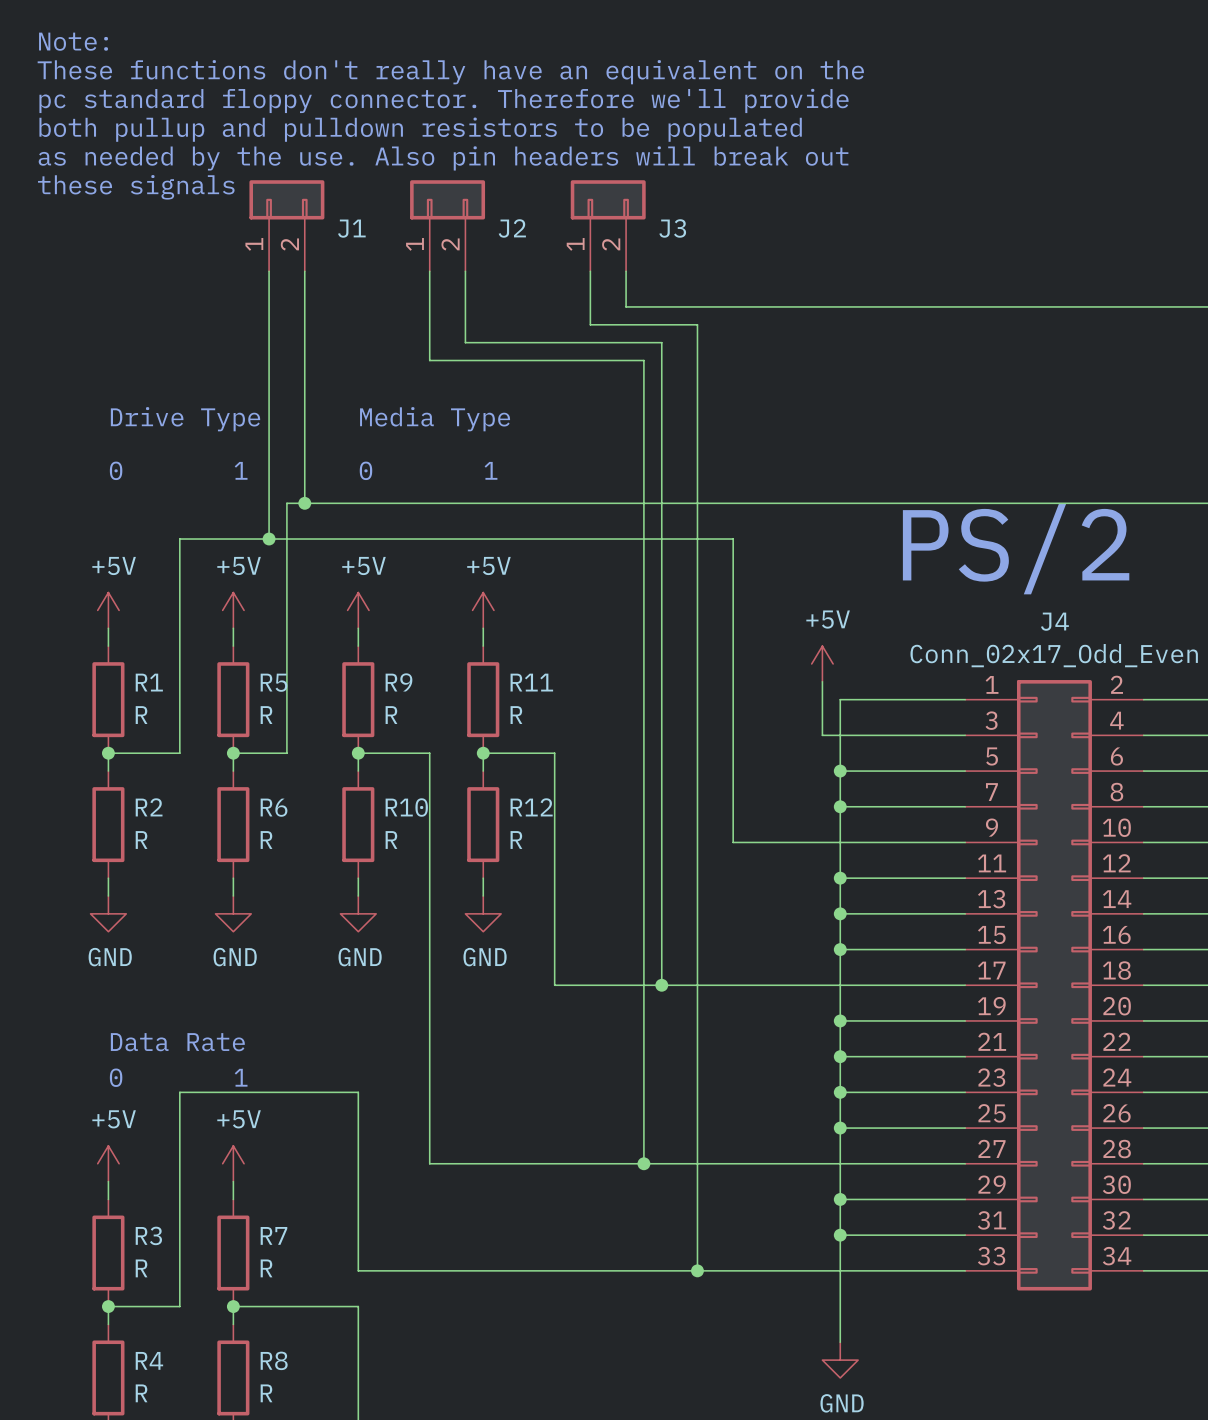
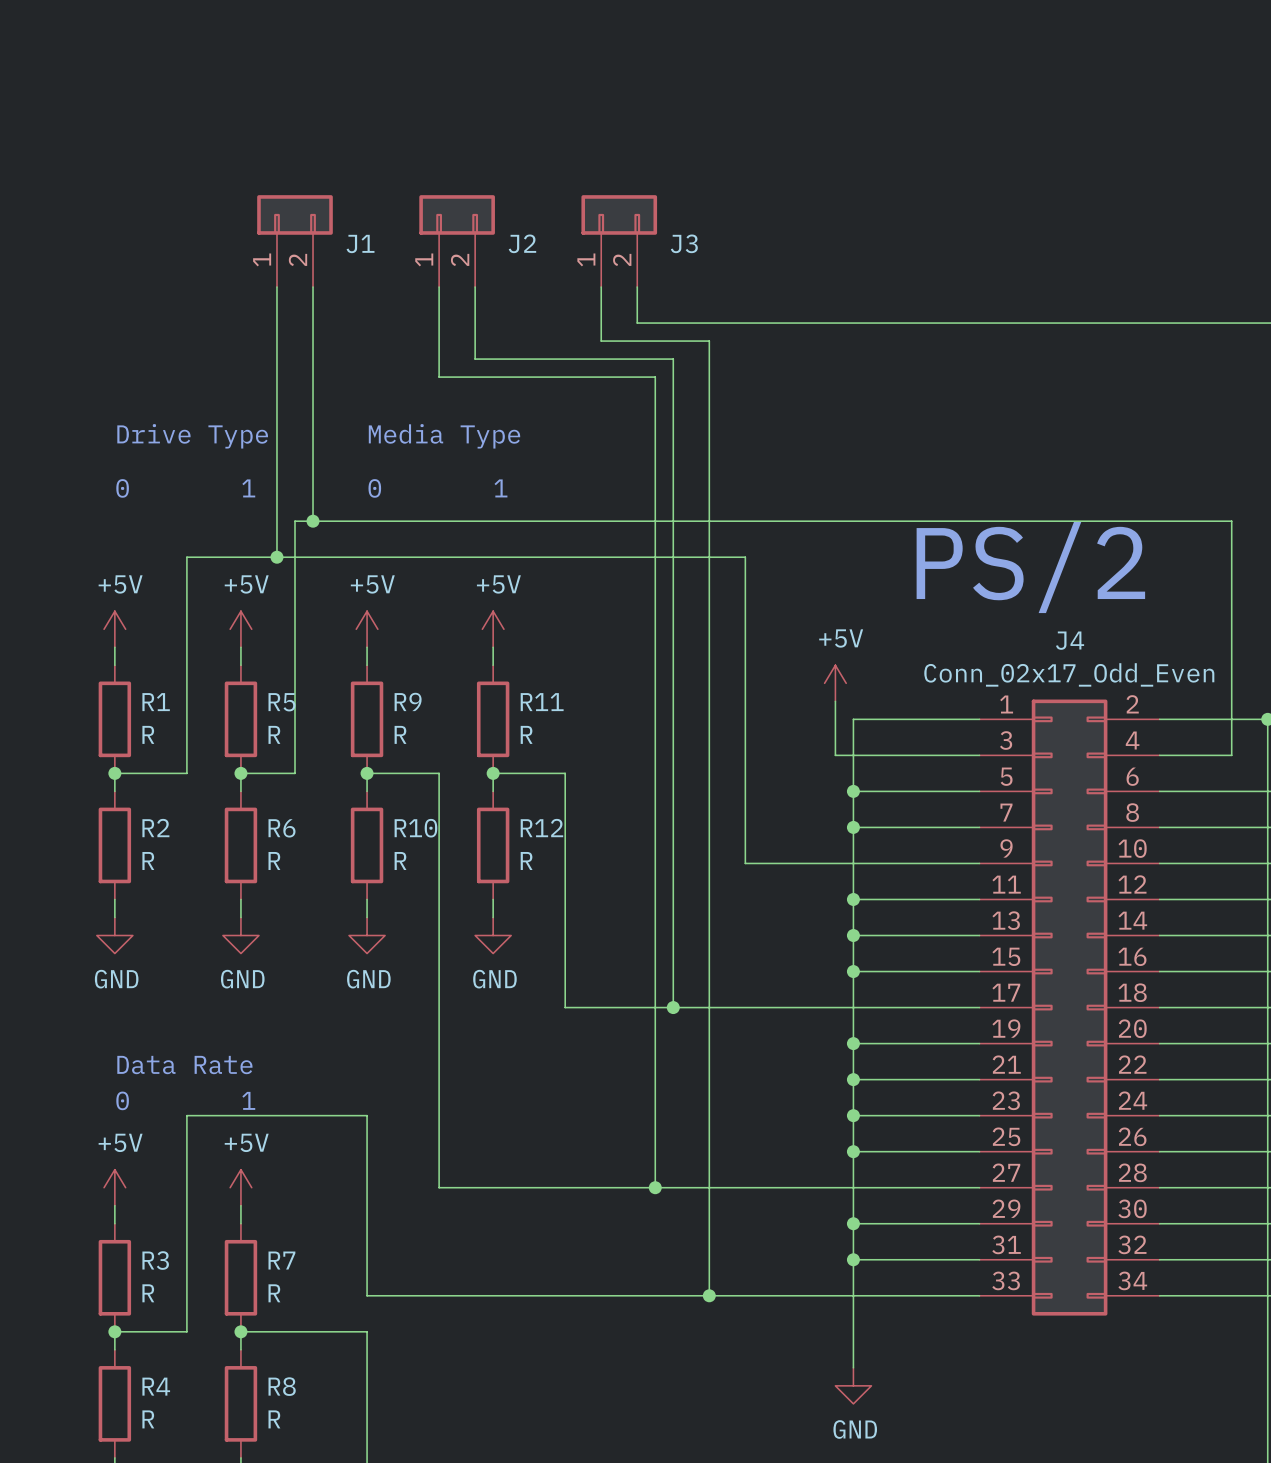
text: Note: (73, 41) -> none
text: These functions don't really have an equivalent on the (450, 72) -> none
text: pc standard floppy connector. Therefore we'll provide (444, 100) -> none
text: both pullup and pulldown resistors to be populated (420, 129) -> none
text: as needed by the use. Also pin headers will break out (443, 158) -> none
text: these signals (136, 187) -> none

